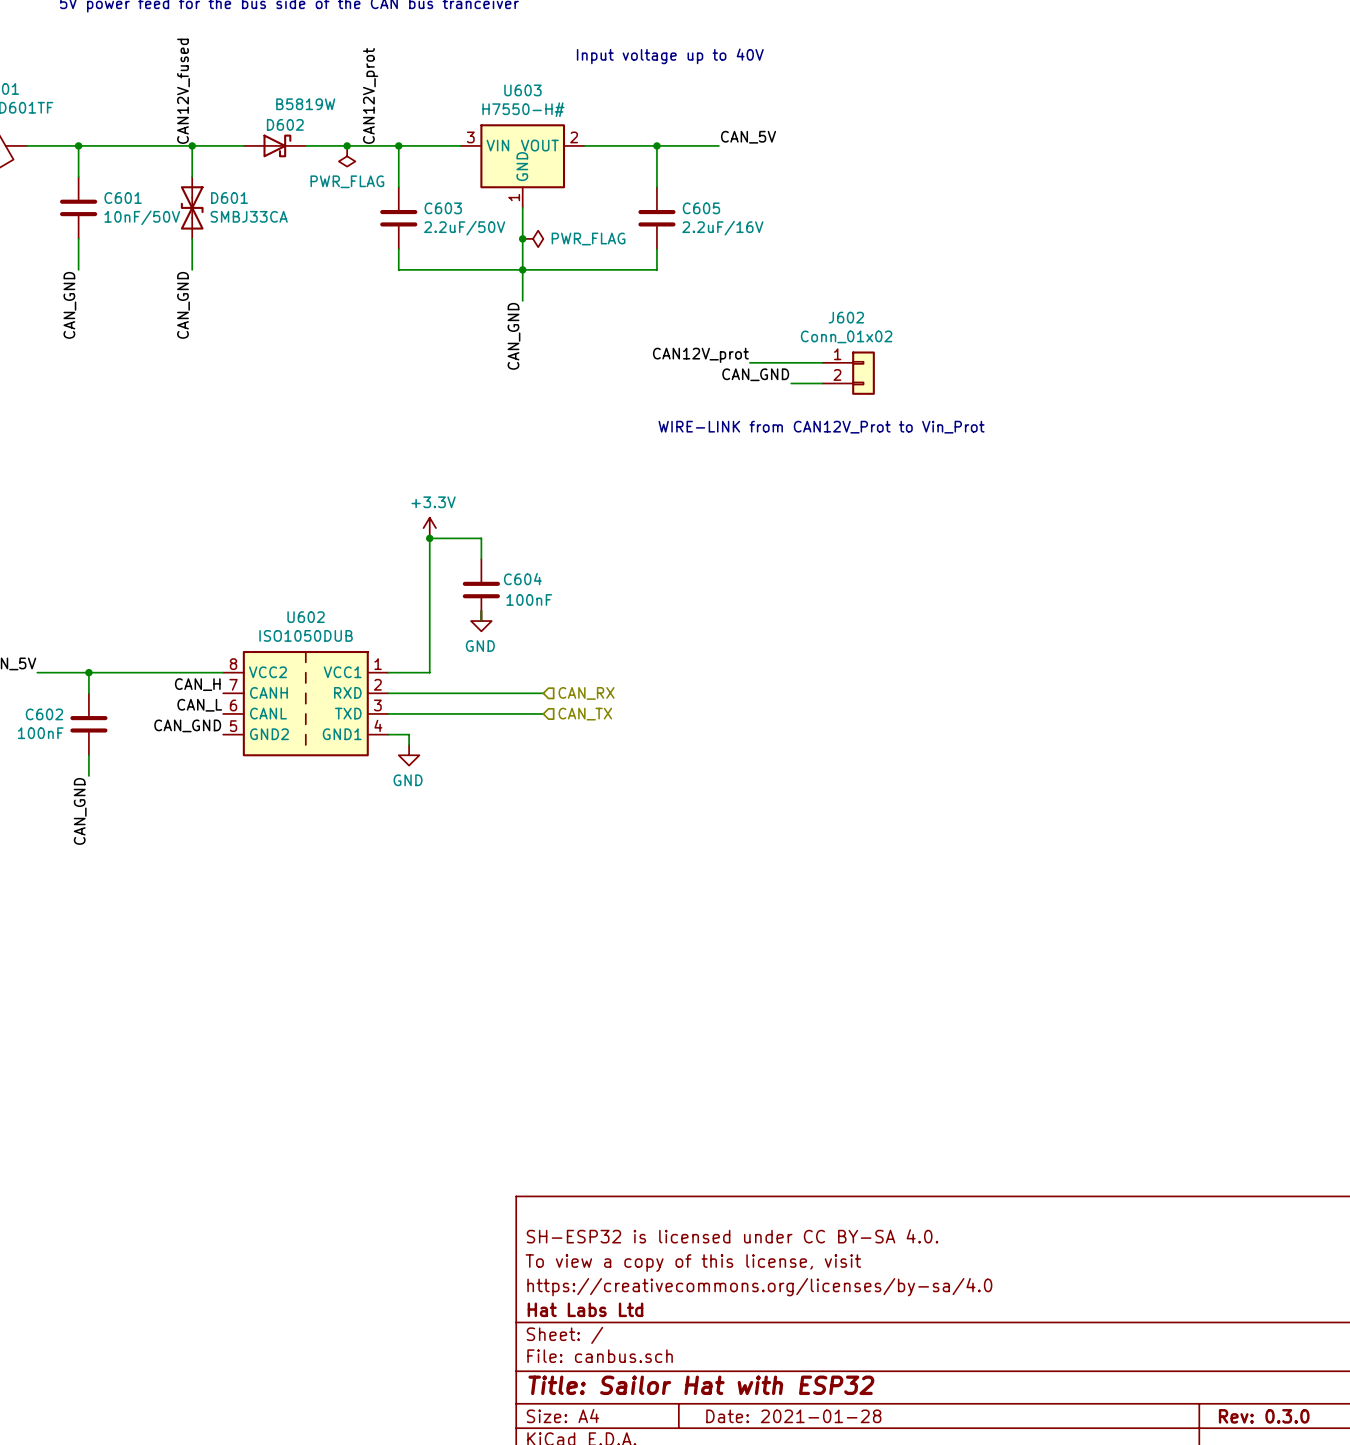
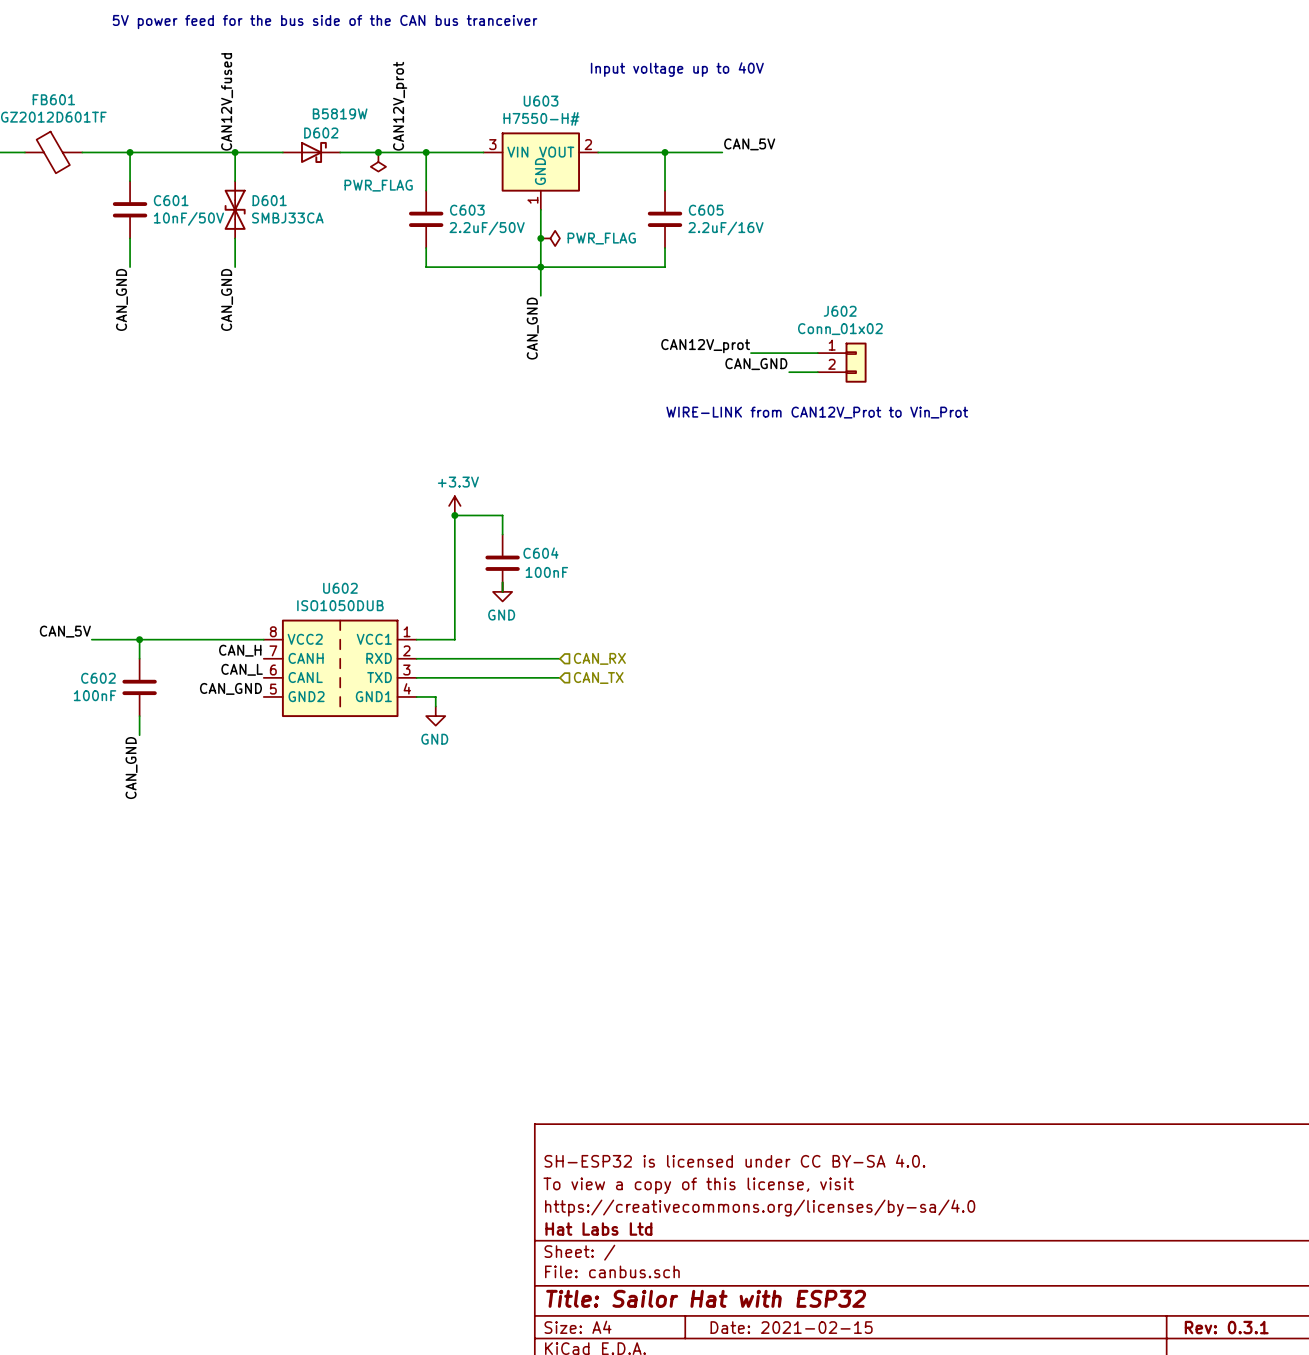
title block: Date: 2021-01-28 (793, 1416) -> Date: 2021-02-15 (791, 1327)
title block: Rev: 0.3.0 (1264, 1416) -> Rev: 0.3.1 (1226, 1327)

